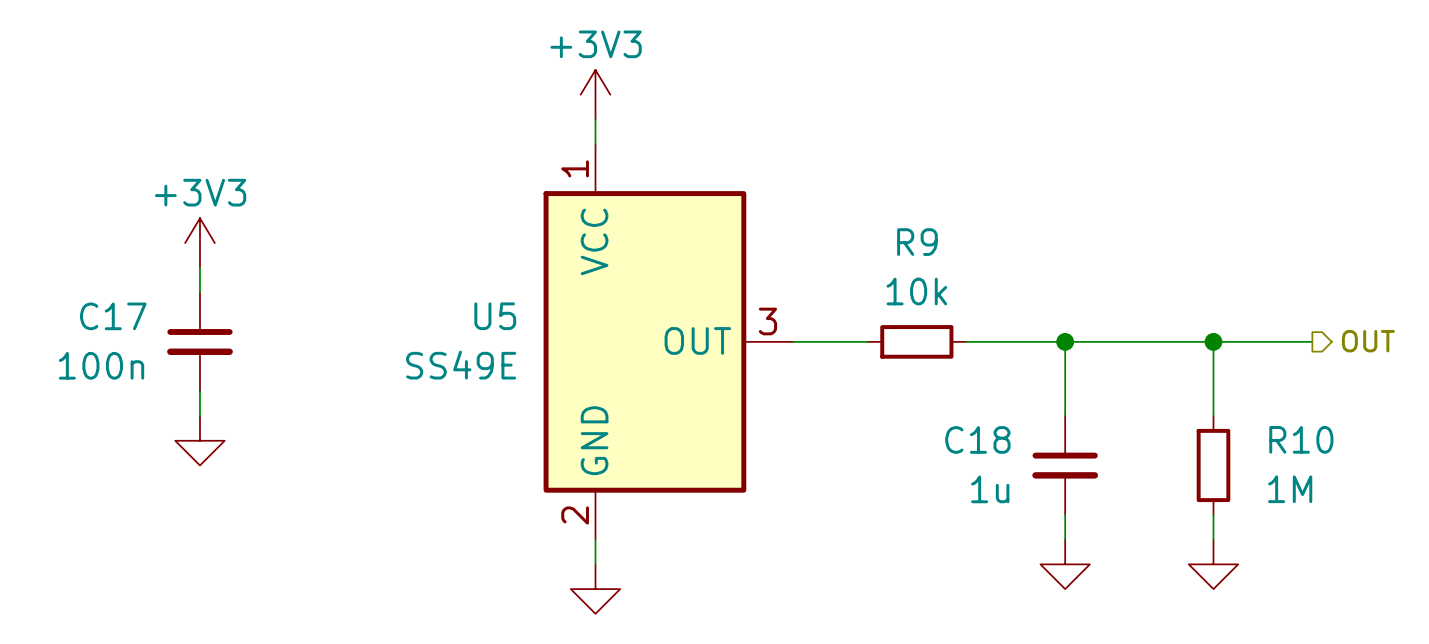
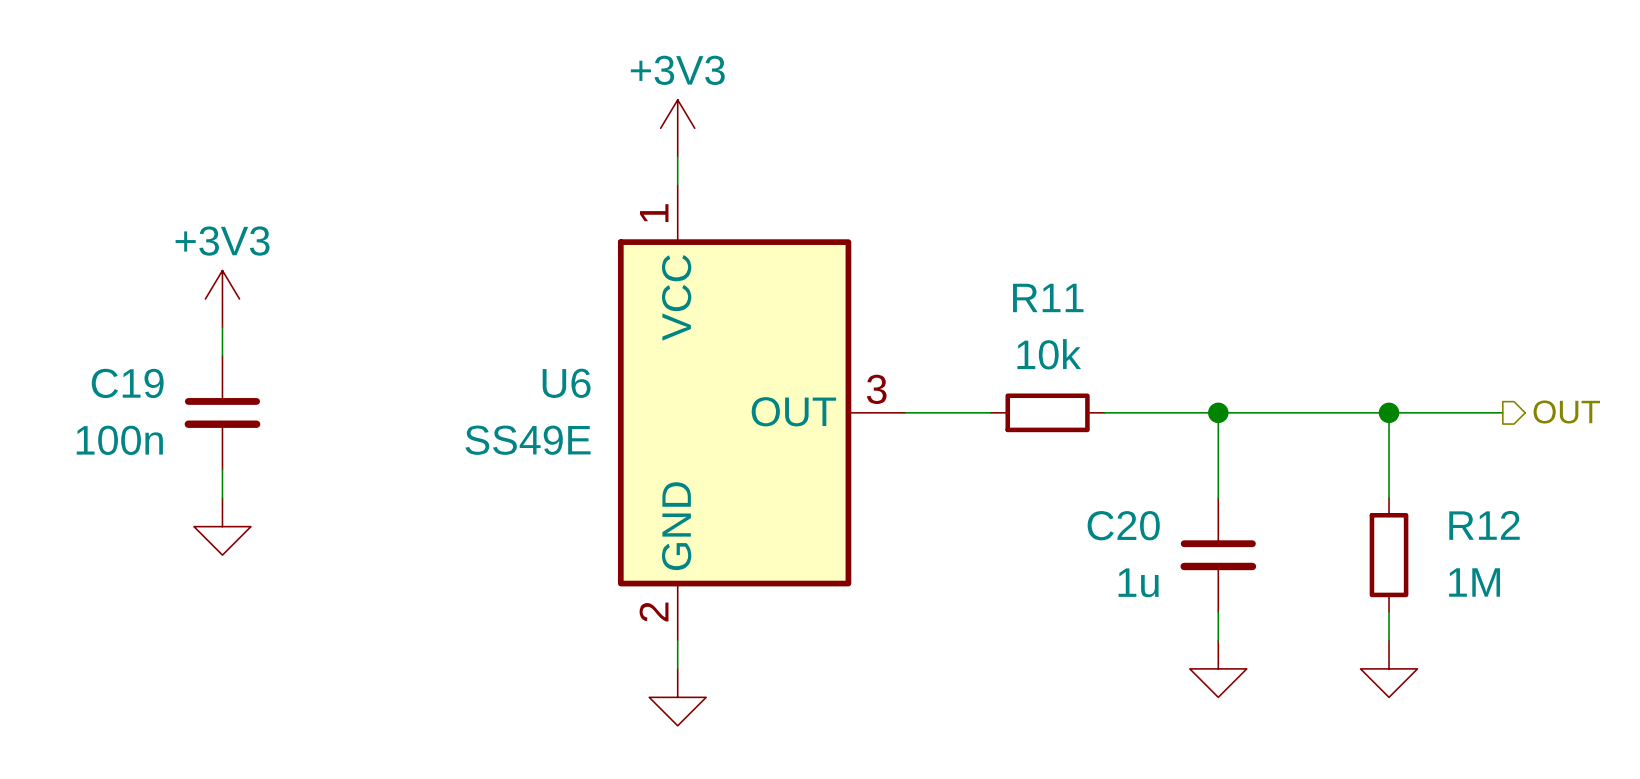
R9 name: R9 (917, 242) -> R11 (1048, 297)
C17 name: C17 (113, 316) -> C19 (127, 383)
U5 name: U5 (495, 316) -> U6 (566, 383)
C18 name: C18 (977, 439) -> C20 (1123, 525)
R10 name: R10 (1301, 439) -> R12 (1484, 525)

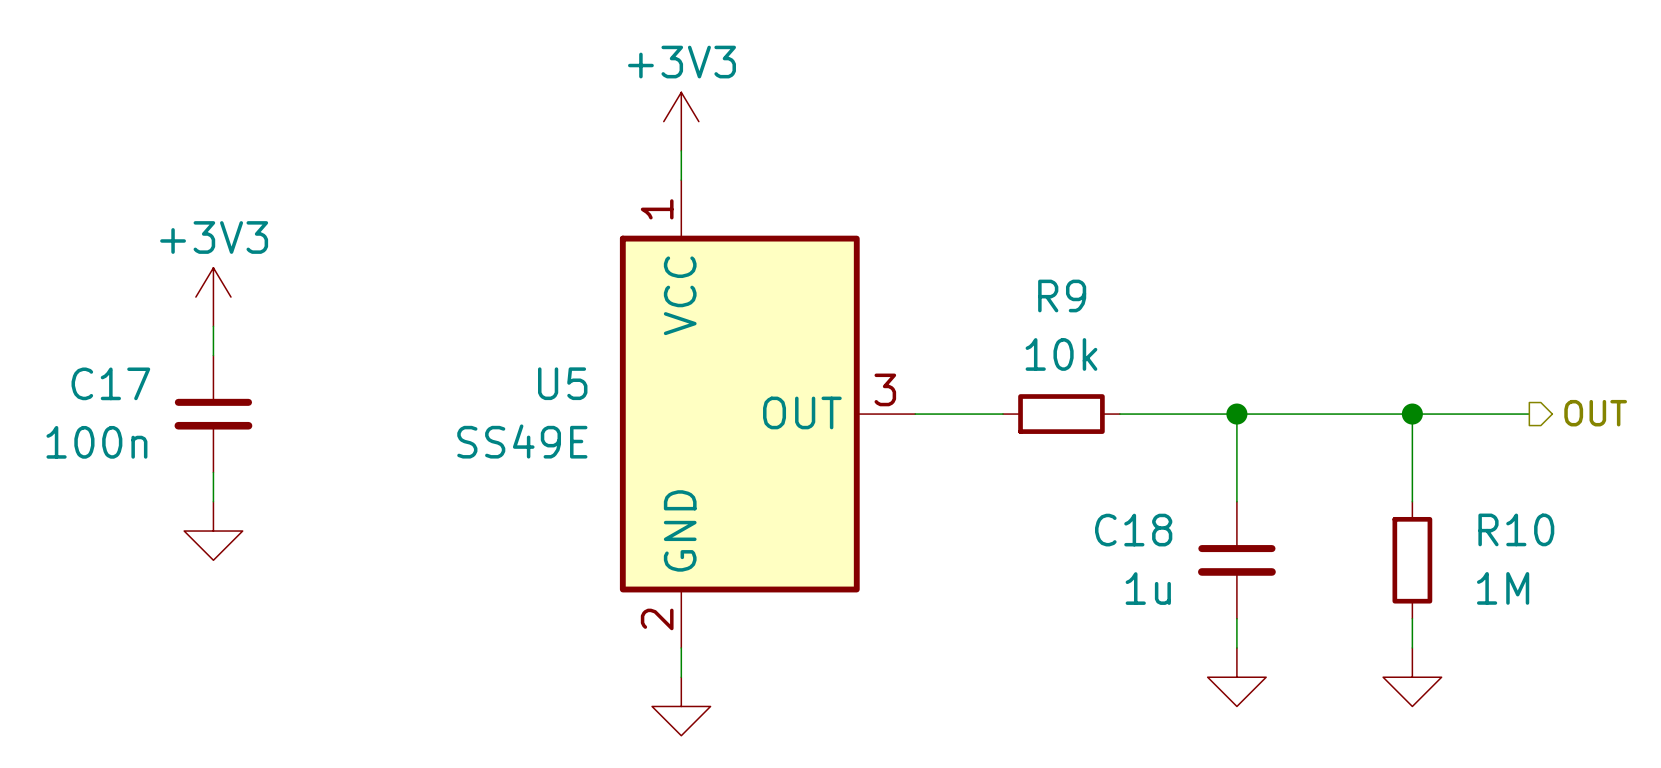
R11 name: R11 (1048, 297) -> R9 (1062, 295)
C19 name: C19 (127, 383) -> C17 (110, 383)
U6 name: U6 (566, 383) -> U5 (562, 383)
C20 name: C20 (1123, 525) -> C18 (1133, 530)
R12 name: R12 (1484, 525) -> R10 (1516, 529)

